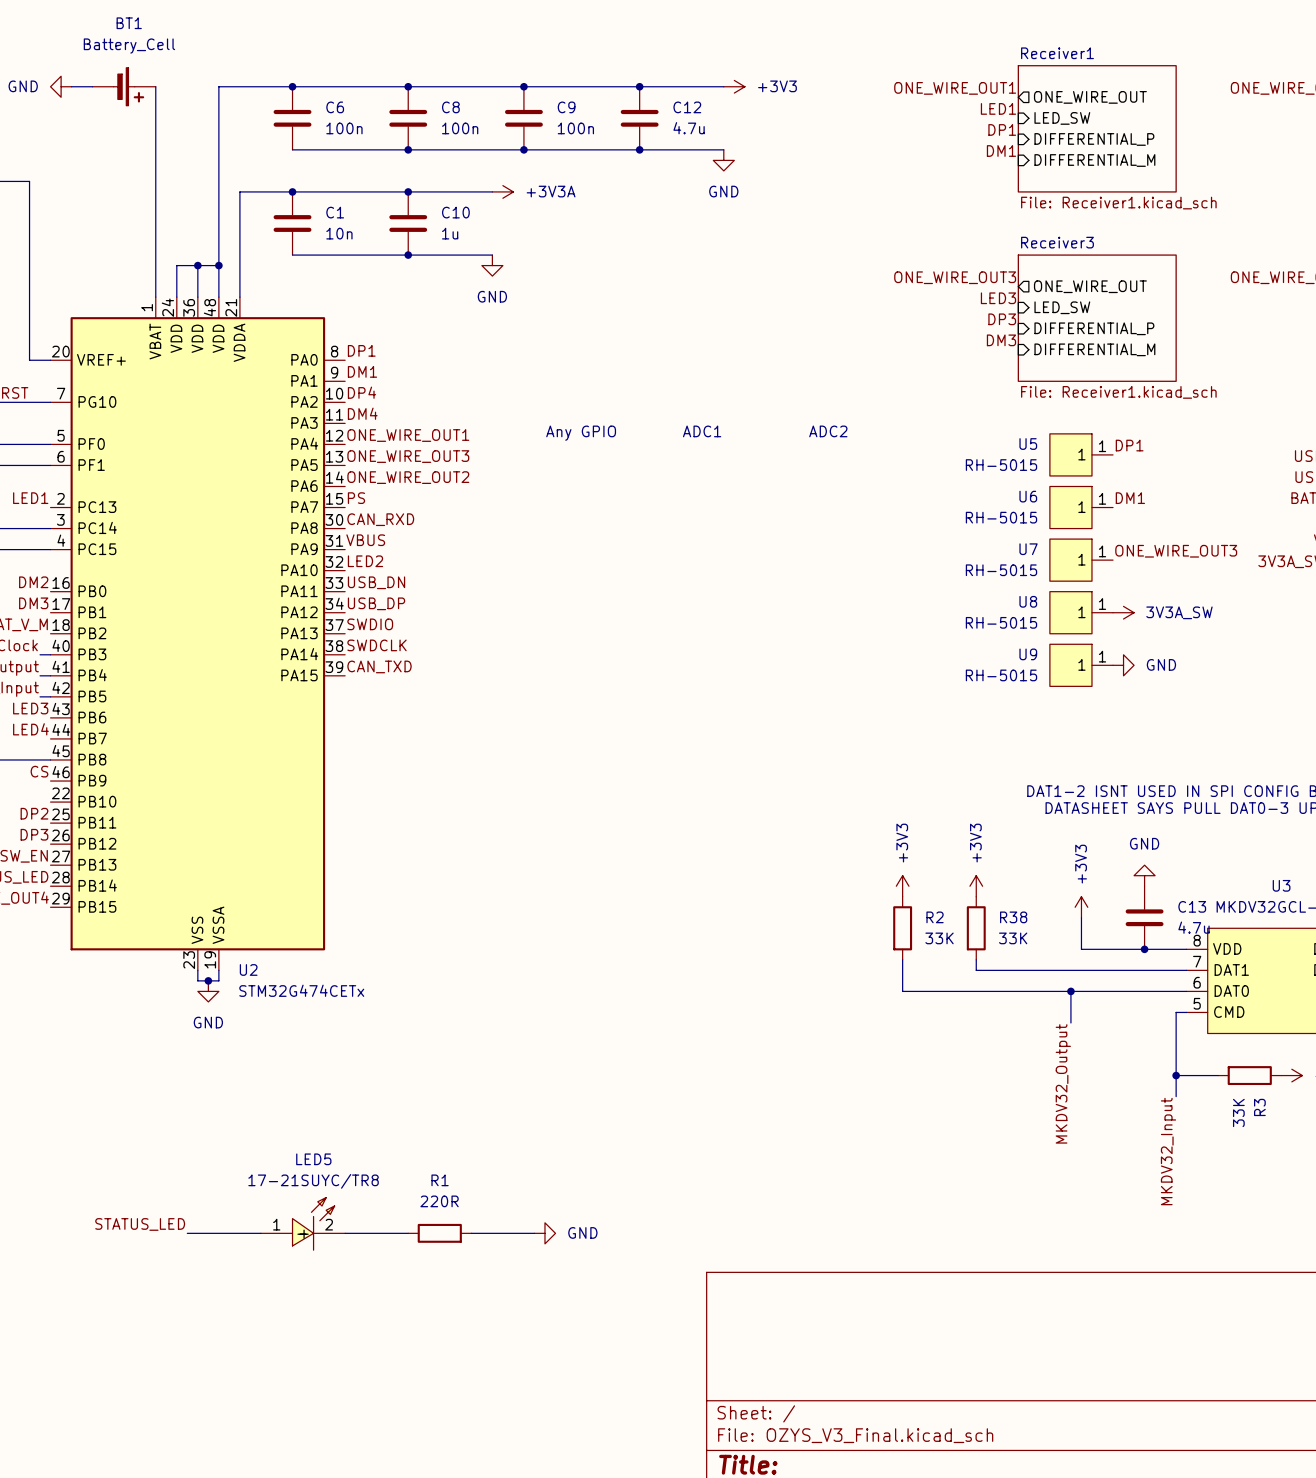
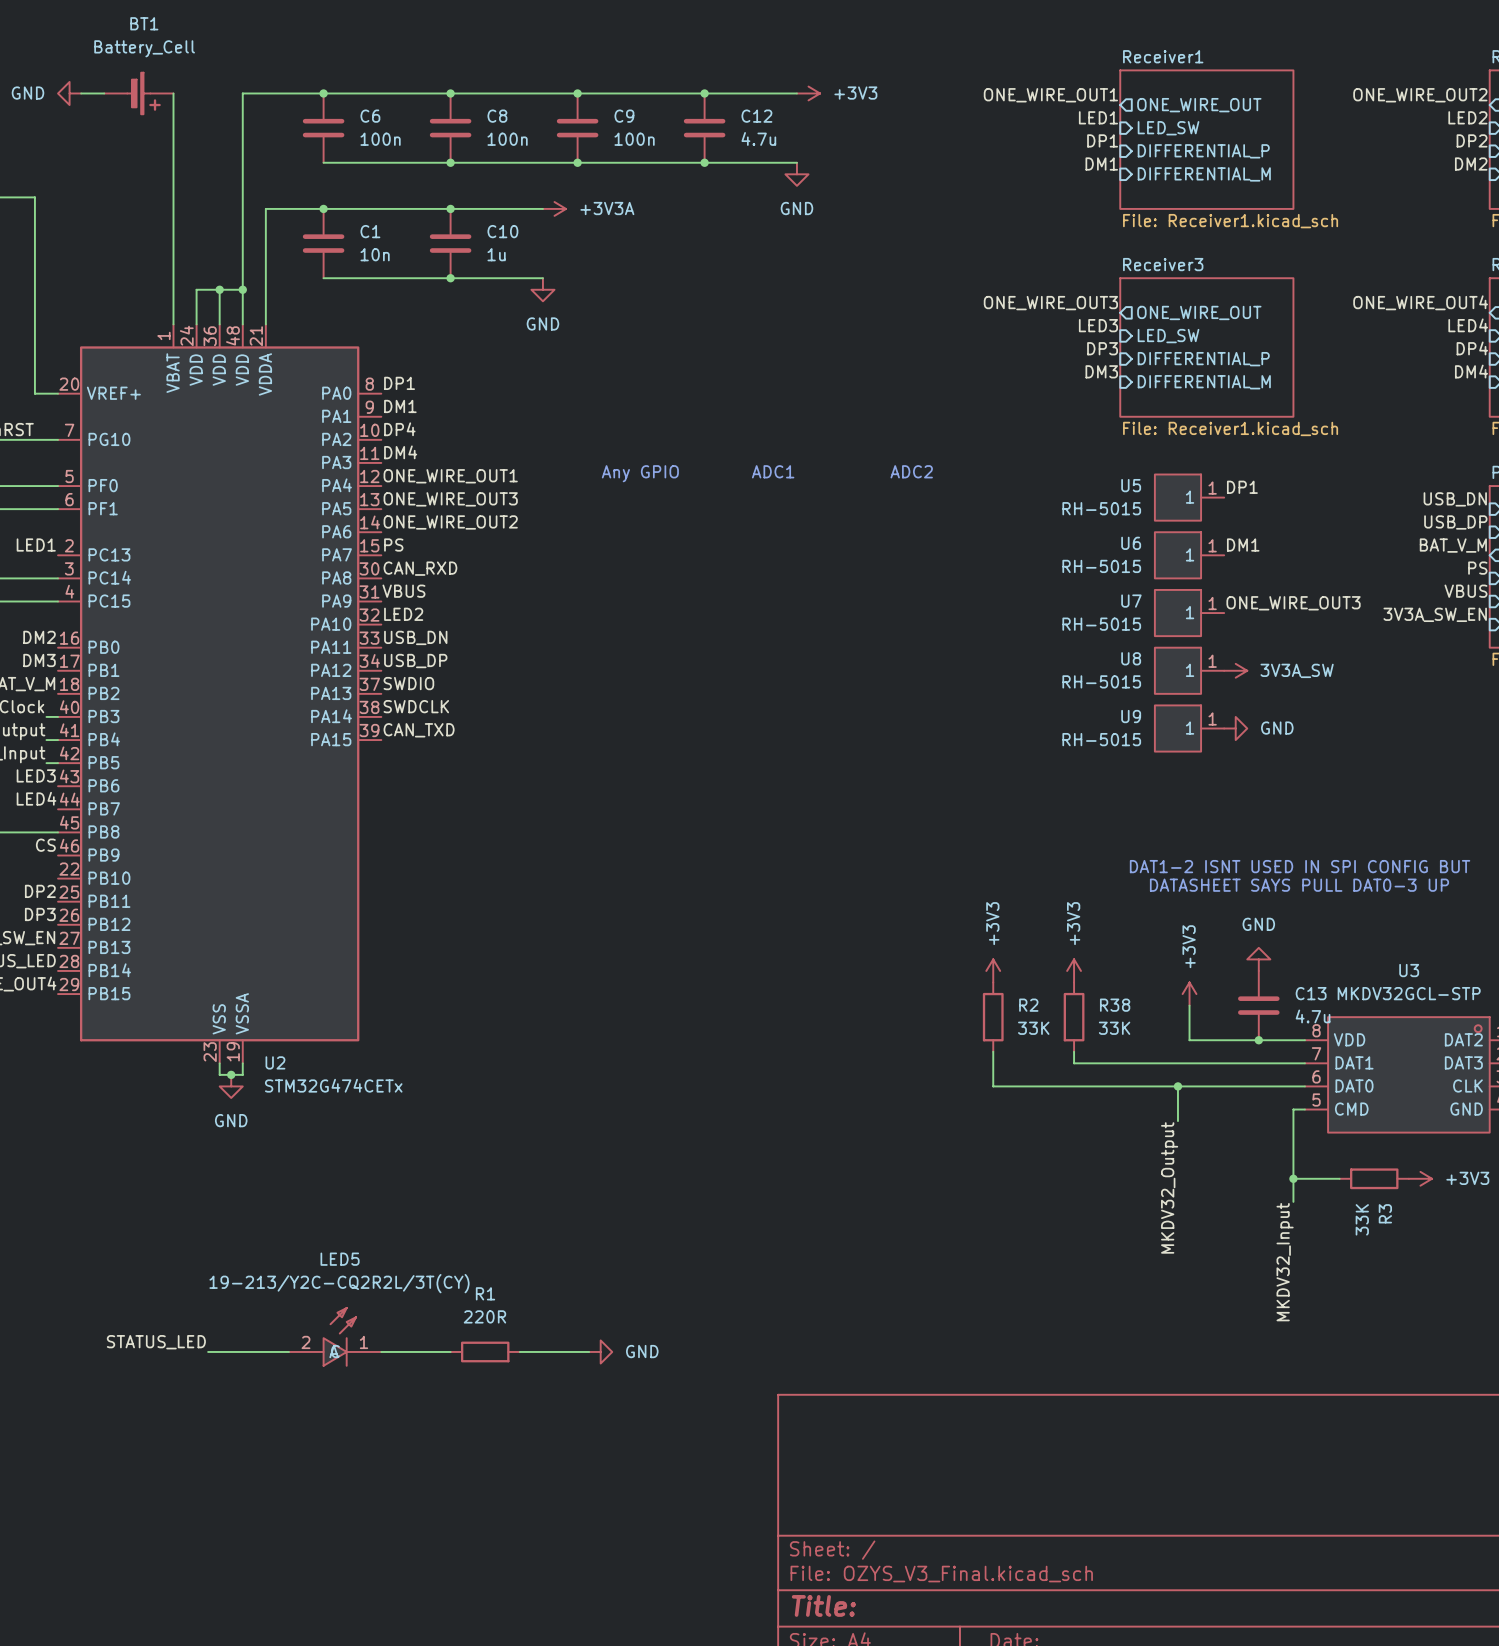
LED5 value: 17-21SUYC/TR8 (313, 1181) -> 19-213/Y2C-CQ2R2L/3T(CY) (339, 1283)
LED5 symbol: [260, 1197, 346, 1251] -> [288, 1308, 382, 1366]

